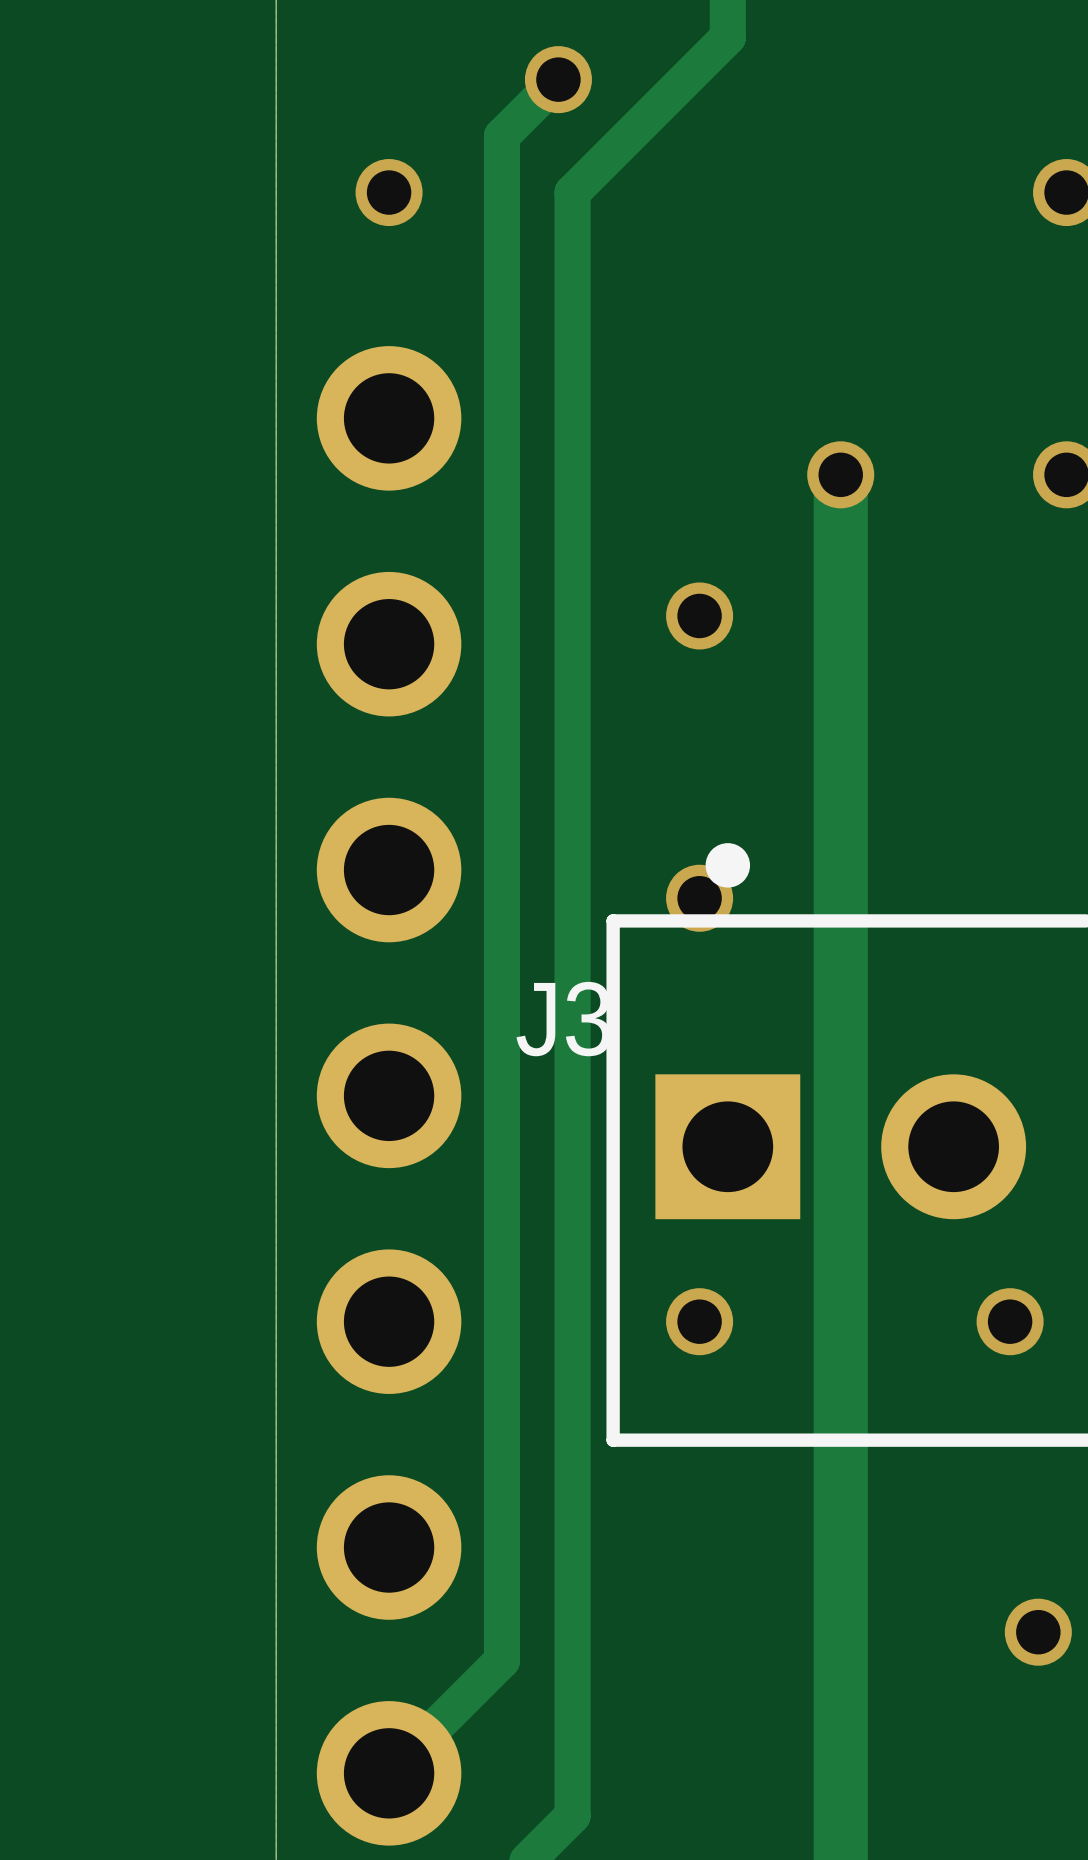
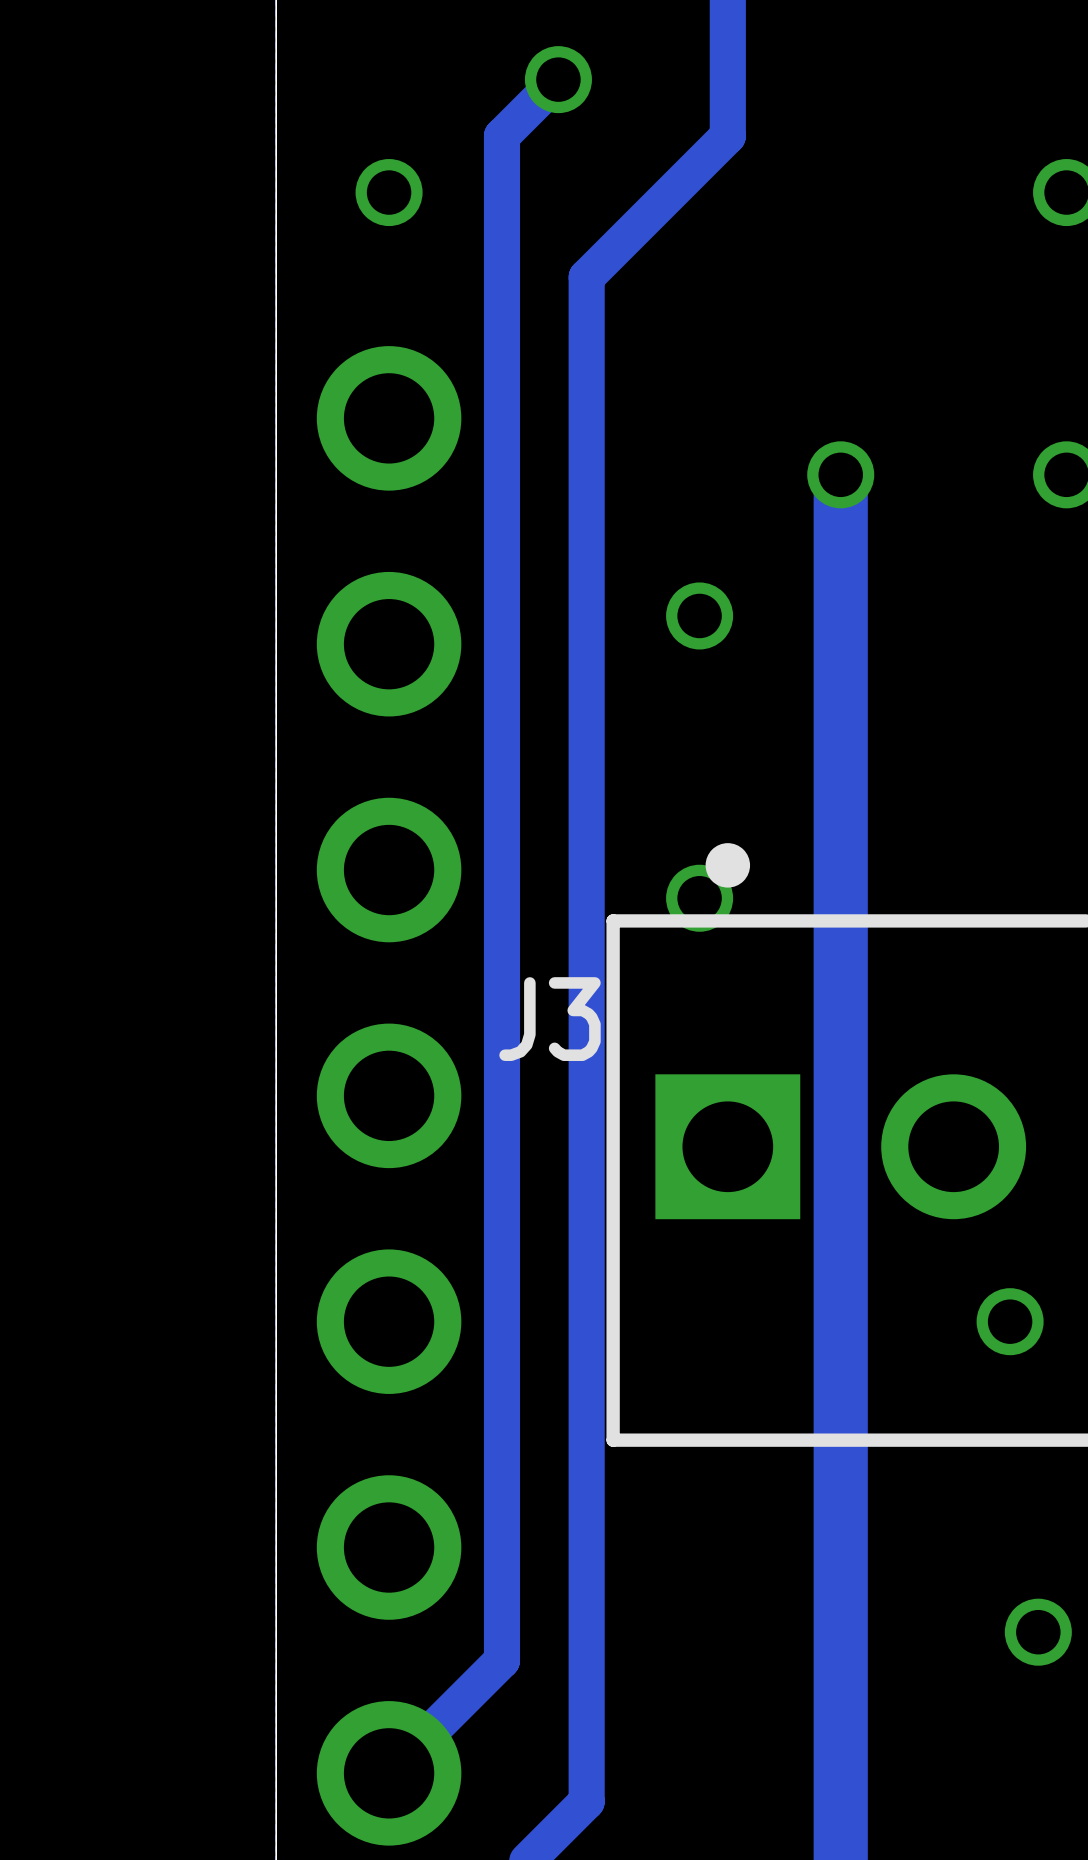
track: (727, 37) (572, 192) (572, 1815) -> (727, 37) (727, 136) (586, 277) (586, 1801) (572, 1815)
via: (699, 1321) -> none

